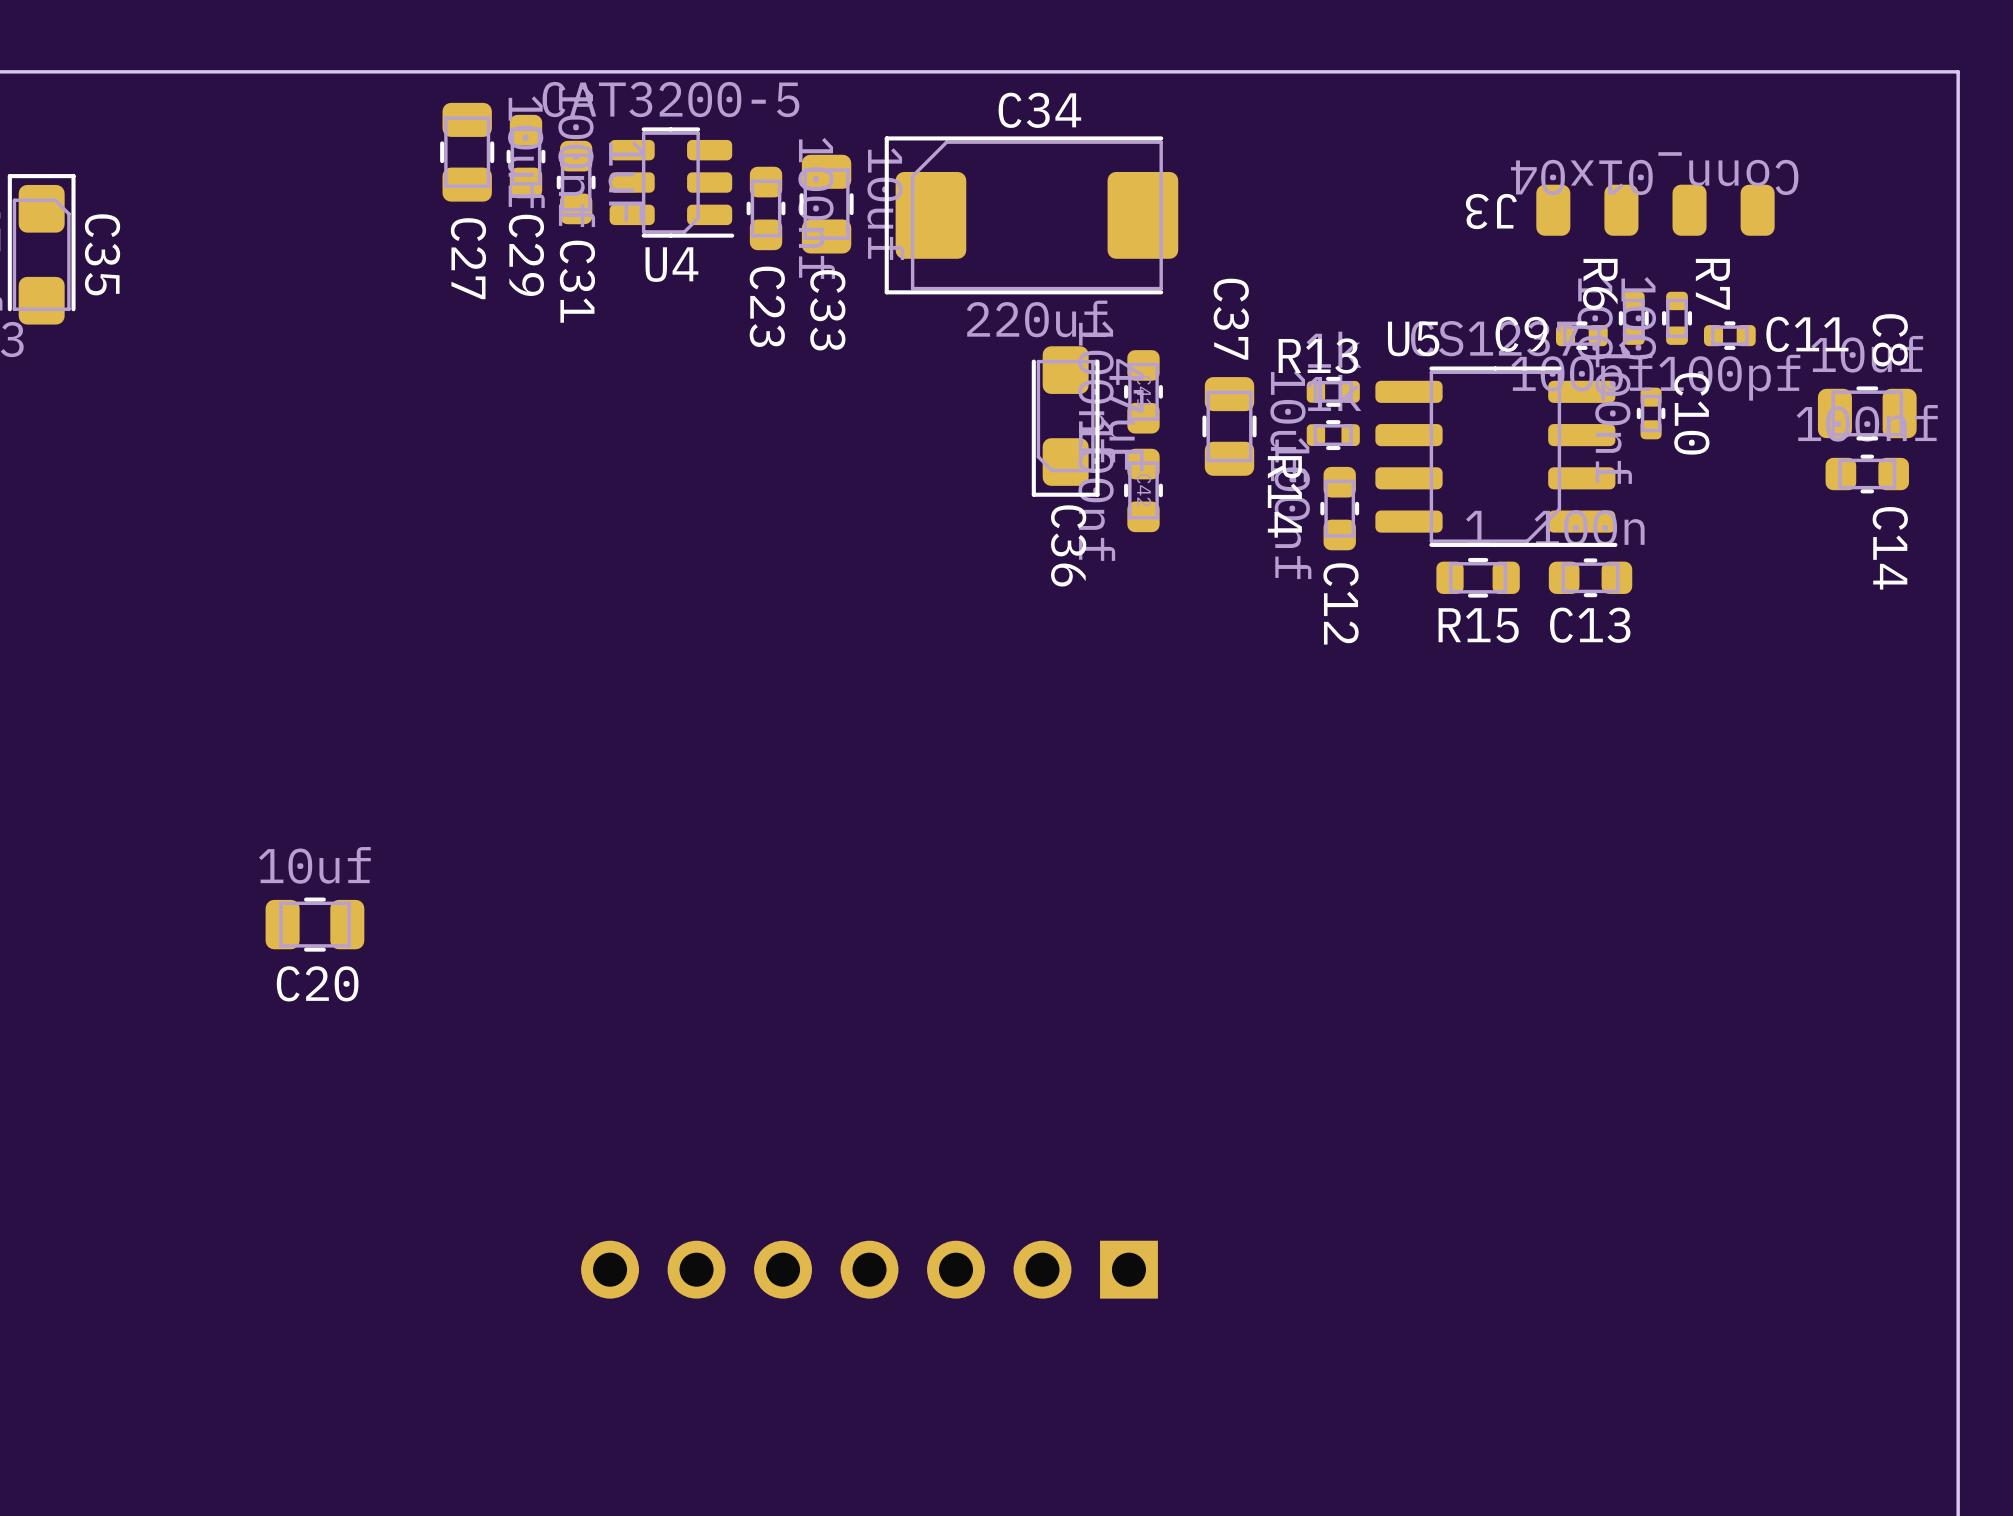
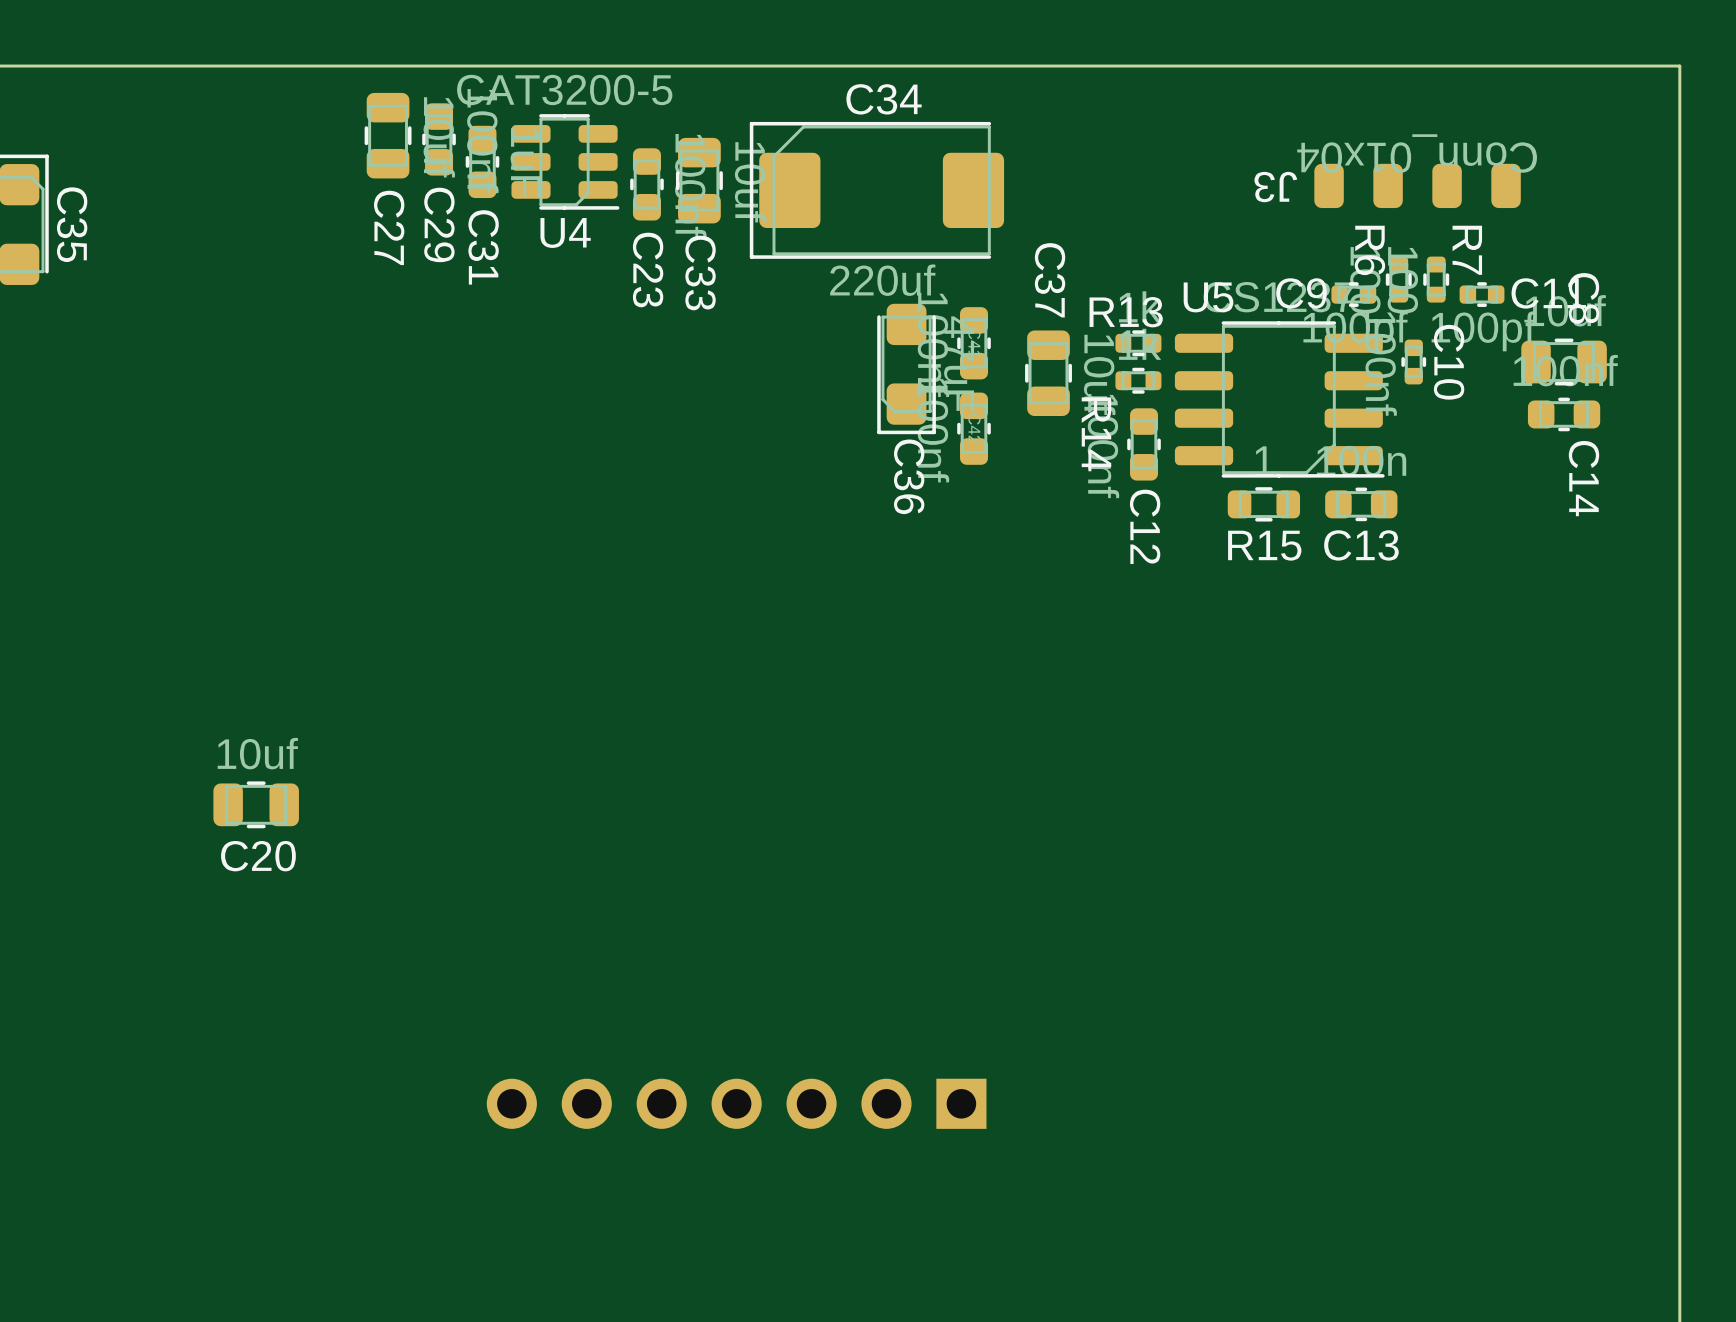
C8 position: (1867, 413) -> (1564, 362)
C14 position: (1867, 474) -> (1564, 414)

